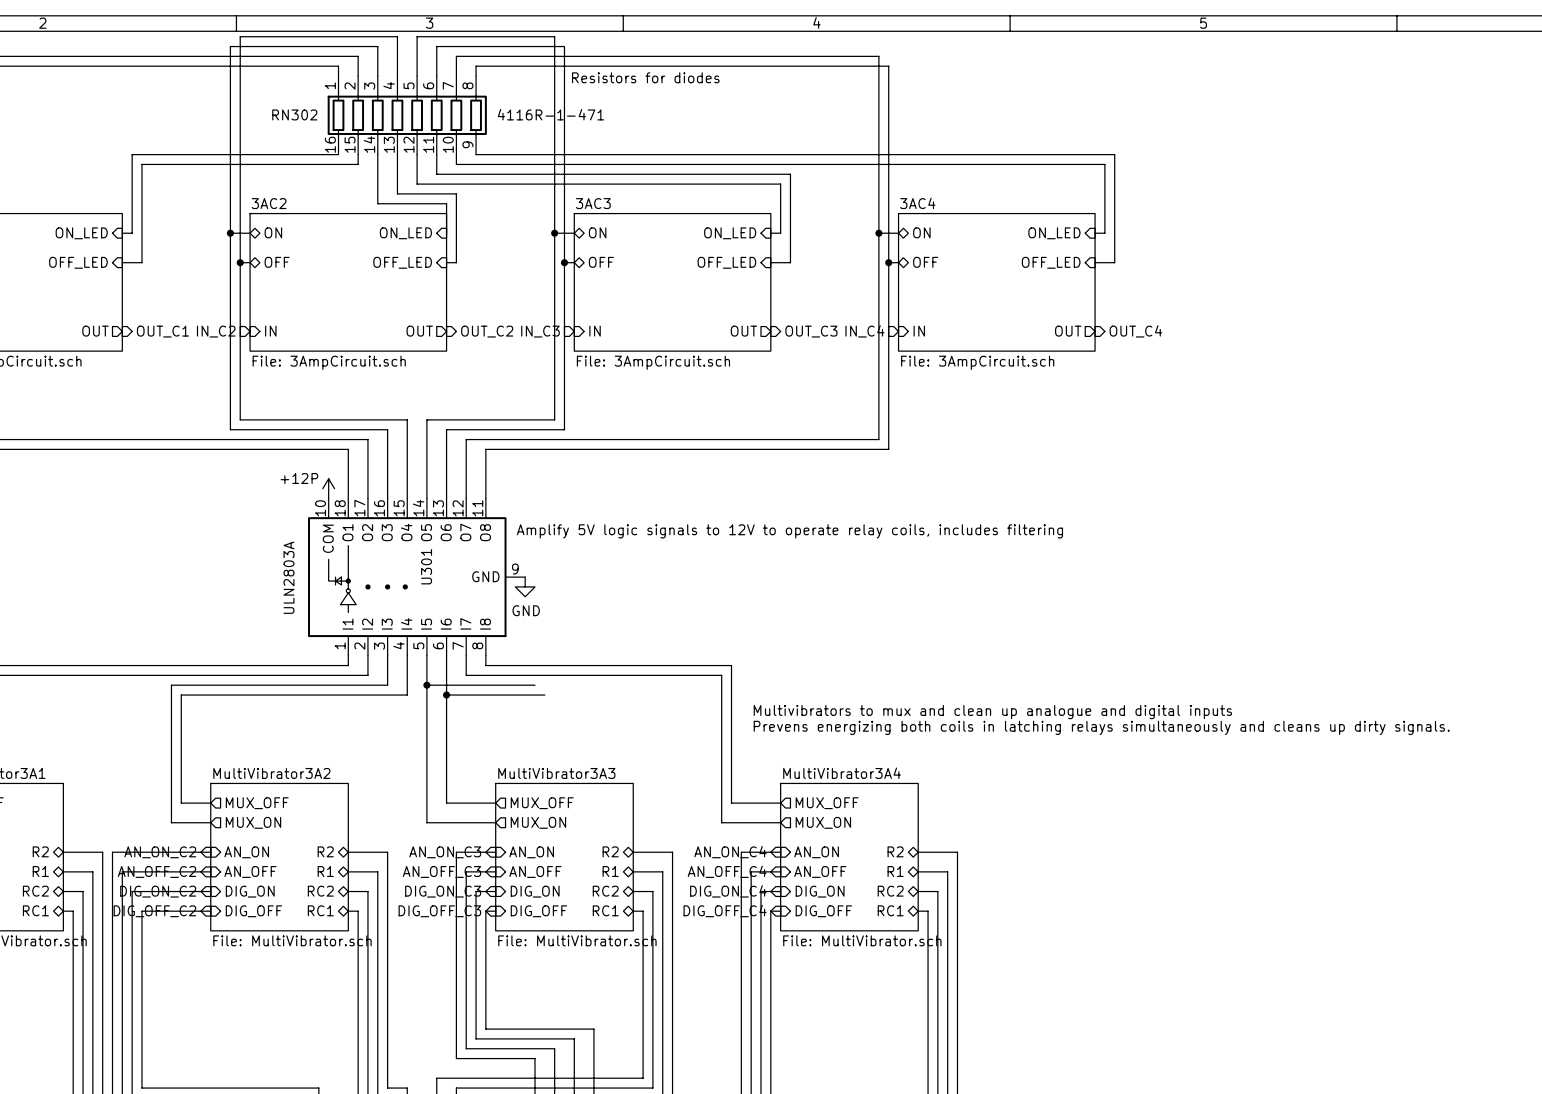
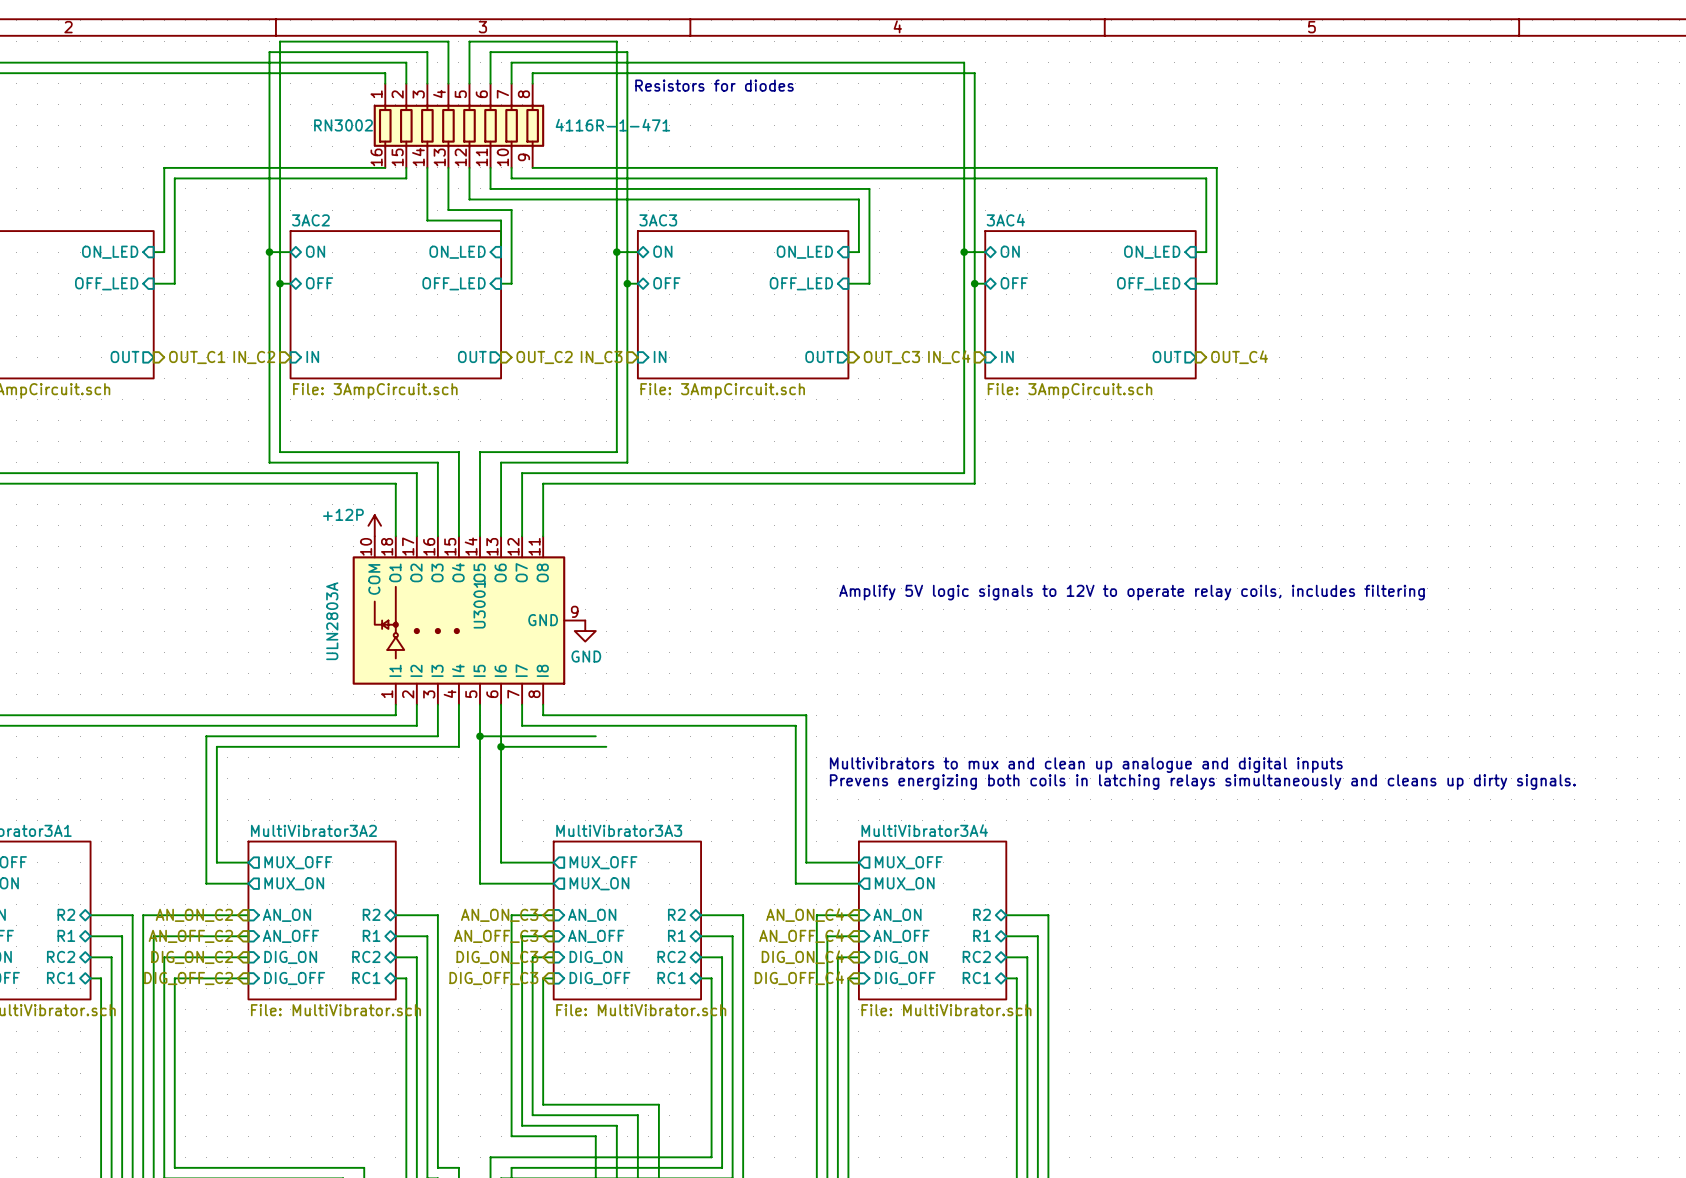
RN302 name: RN302 (294, 114) -> RN3002 (343, 125)
text: Amplify 5V logic signals to 12V to operate relay coils, includes filtering (789, 531) -> none
text: none -> Amplify 5V logic signals to 12V to operate relay coils, includes filtering (1132, 592)
U301 name: U301 (426, 566) -> U3001 (479, 604)

